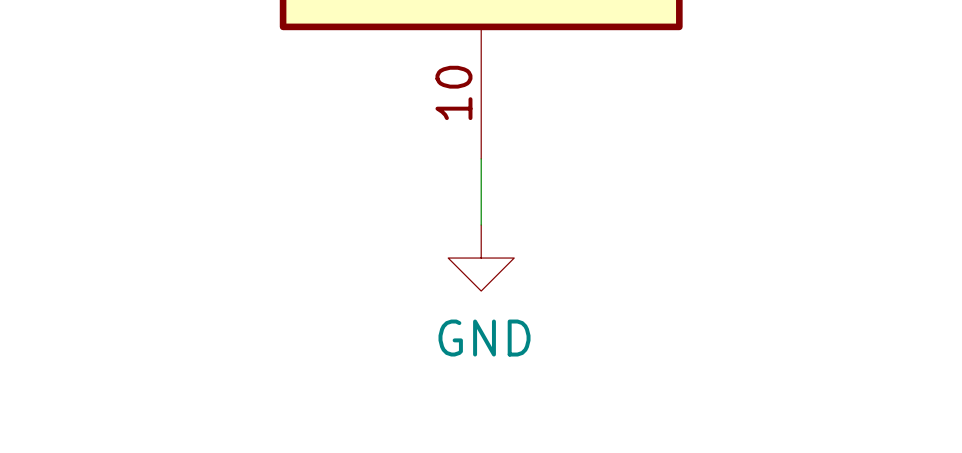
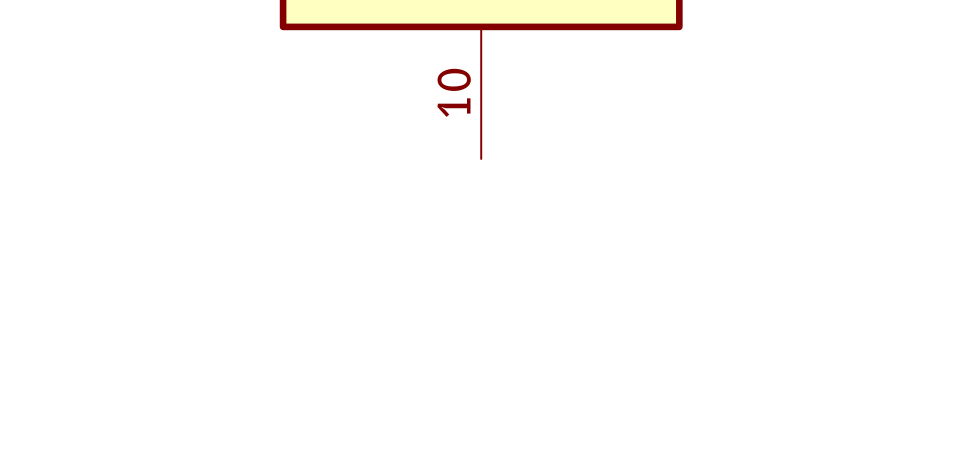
wire: (481, 158) (481, 225) -> none
power symbol: GND (481, 258) -> none

